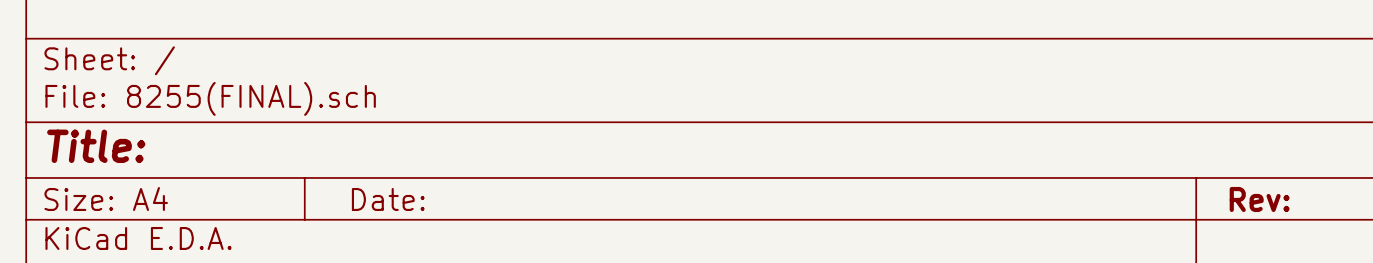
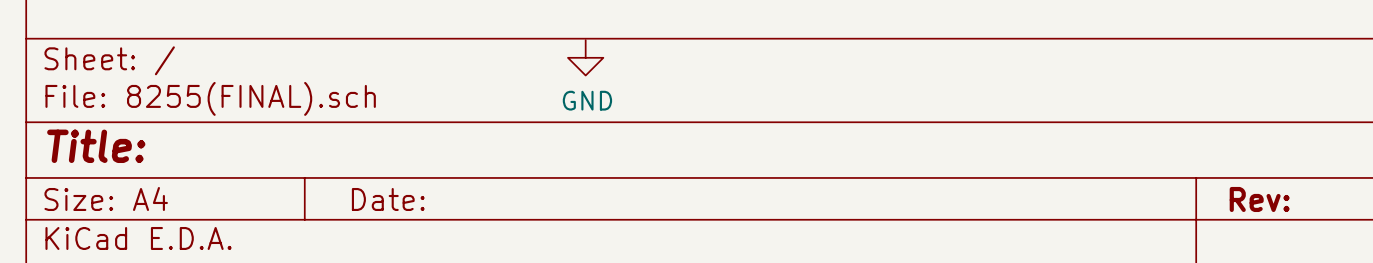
power symbol: none -> GND (585, 57)

